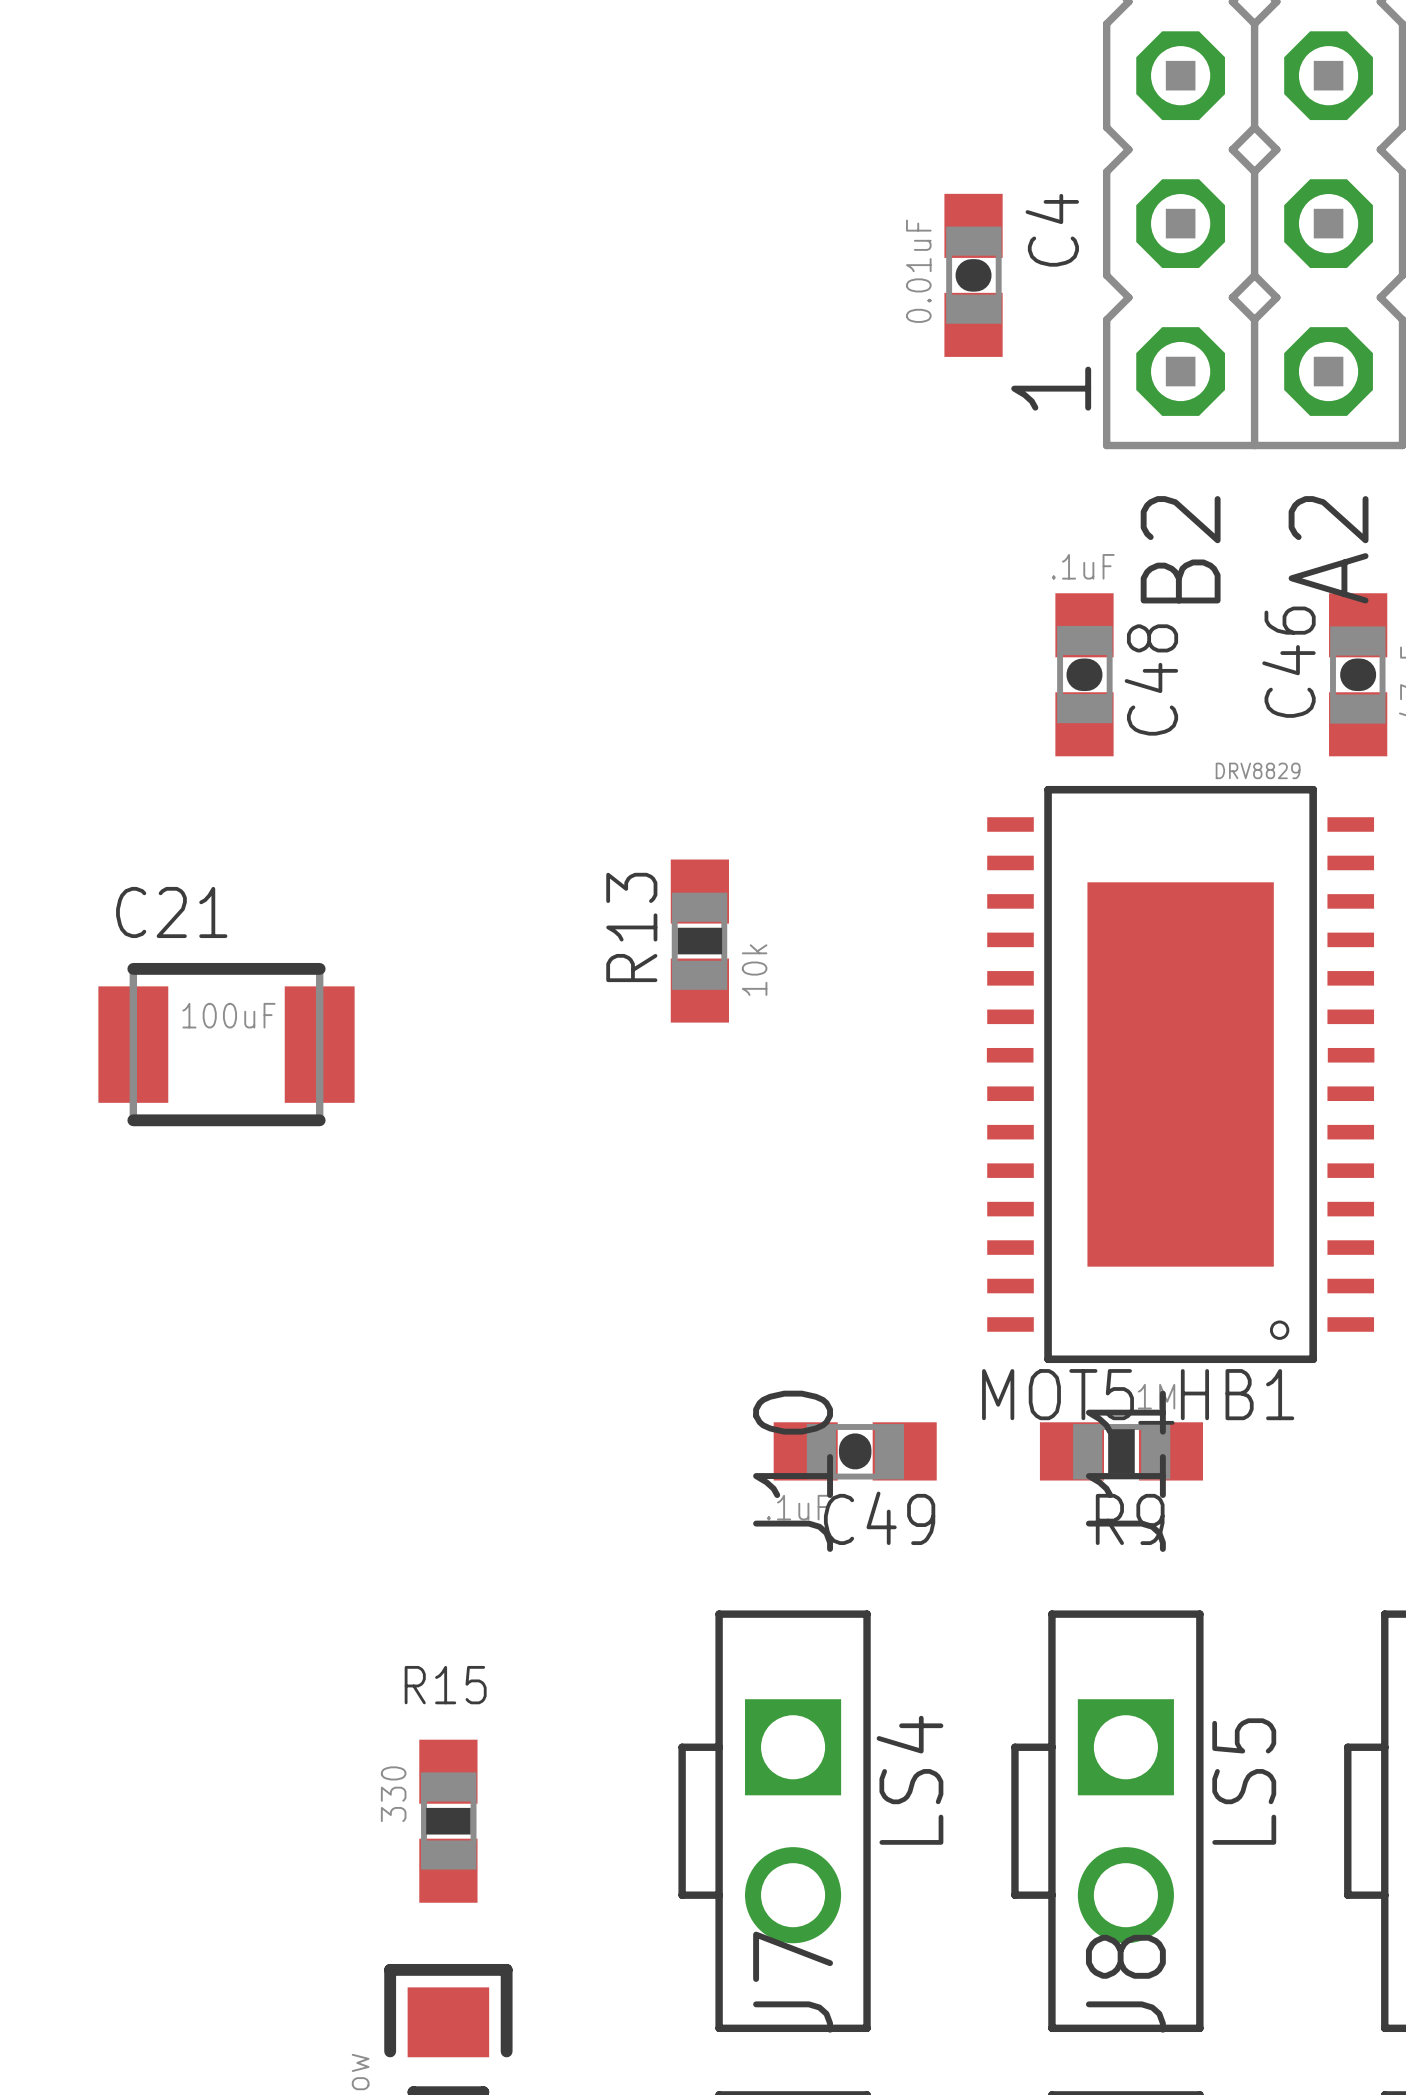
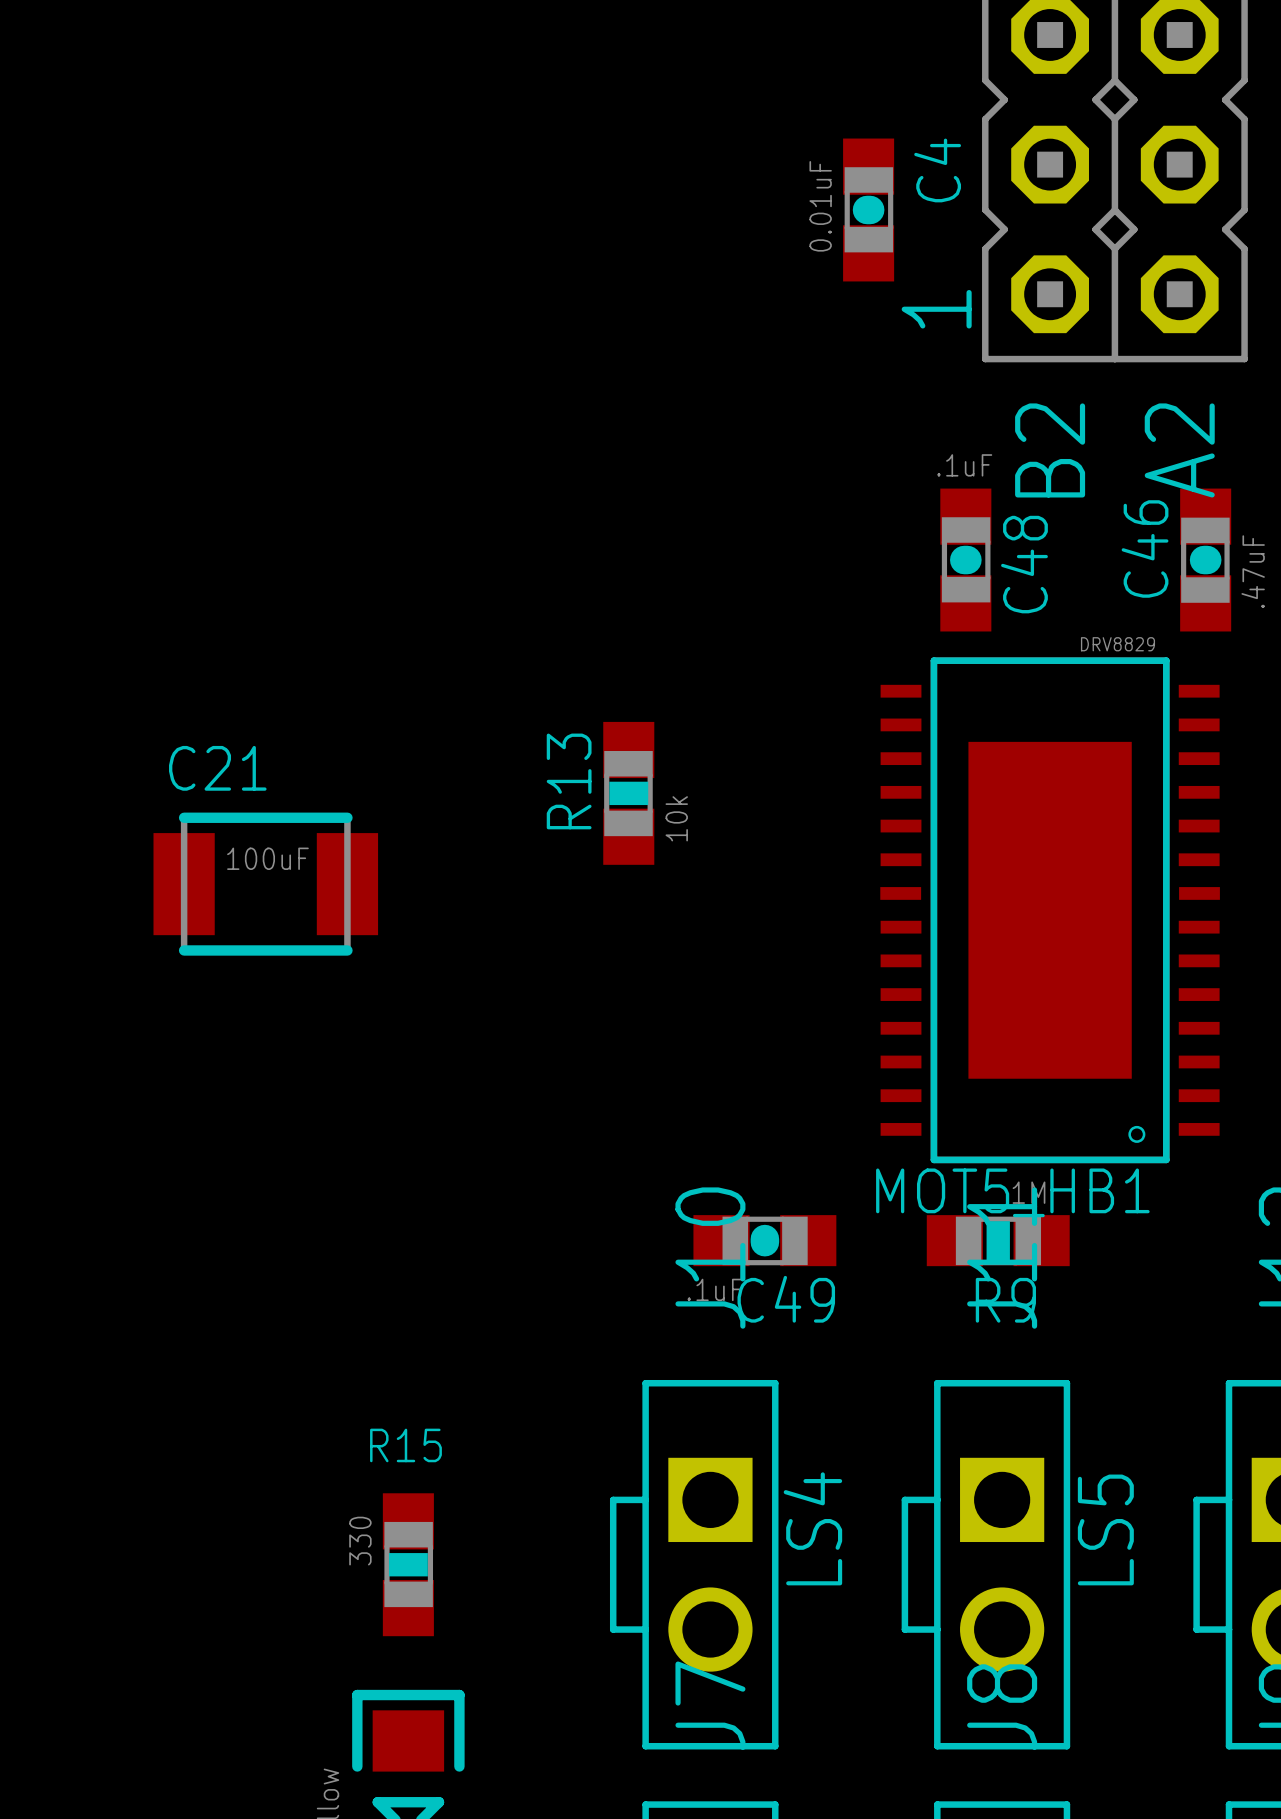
C21 position: (226, 1044) -> (265, 884)

